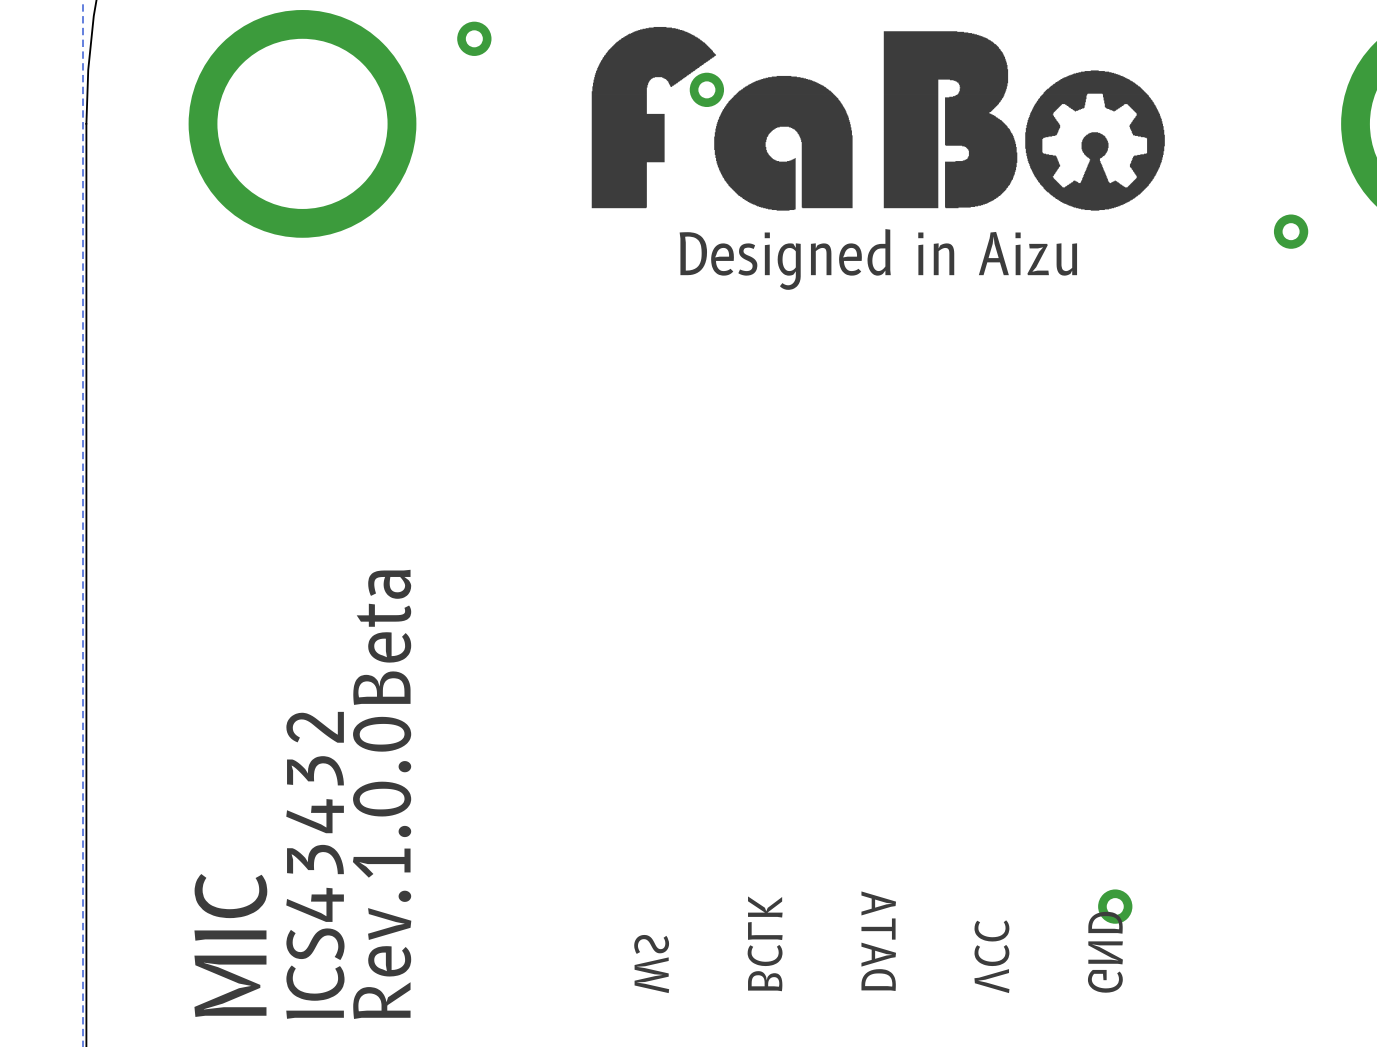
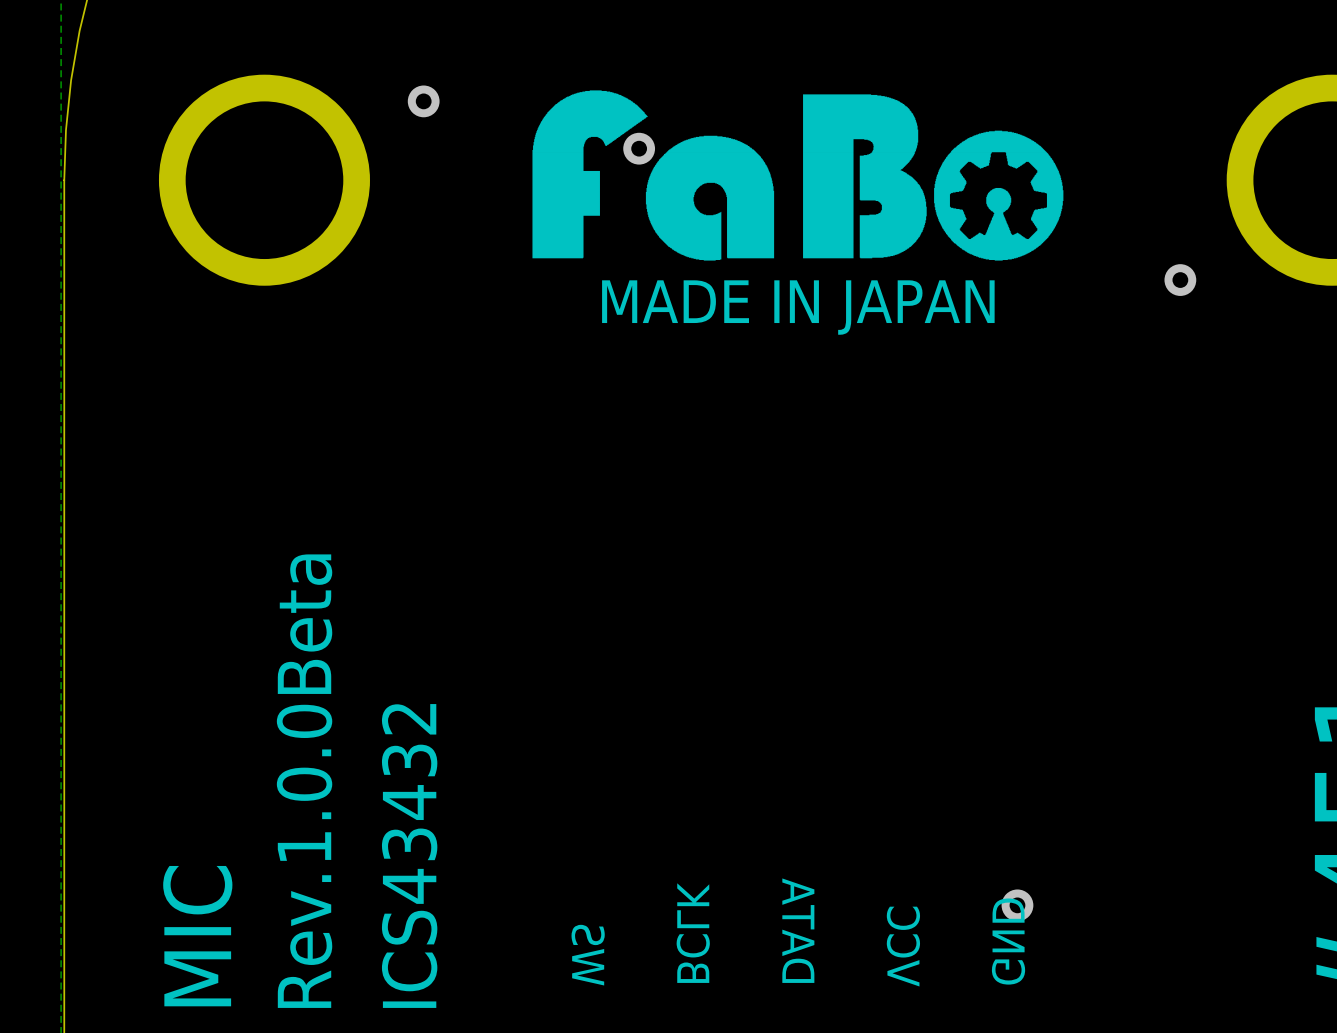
text: Designed in Aizu (878, 259) -> MADE IN JAPAN (798, 307)
text position: Rev.1.0.0Beta (382, 794) -> Rev.1.0.0Beta (304, 781)
text position: ICS43432 (315, 865) -> ICS43432 (409, 855)

